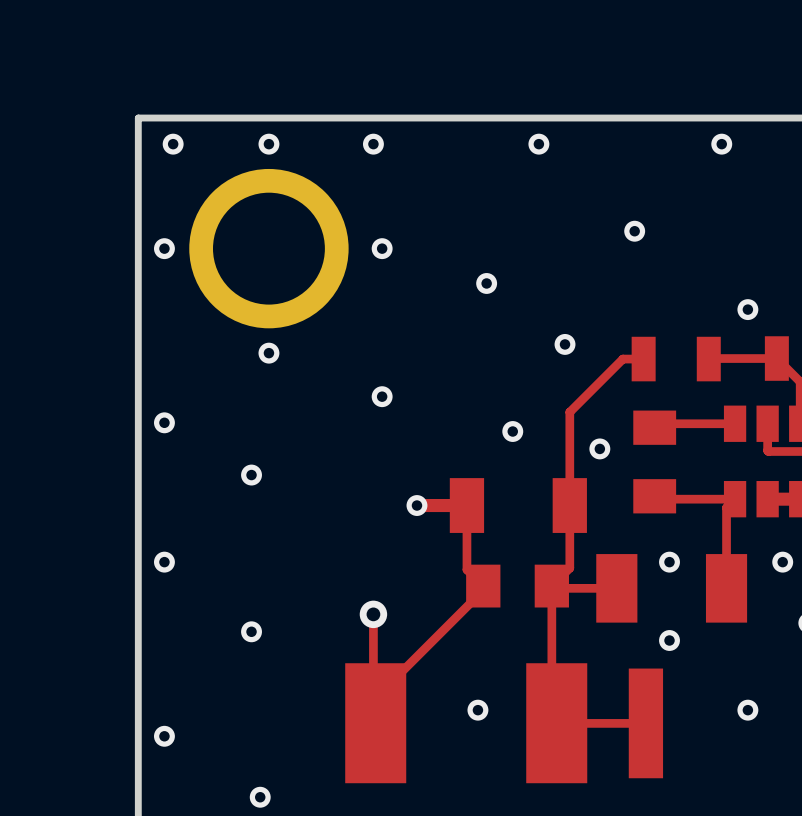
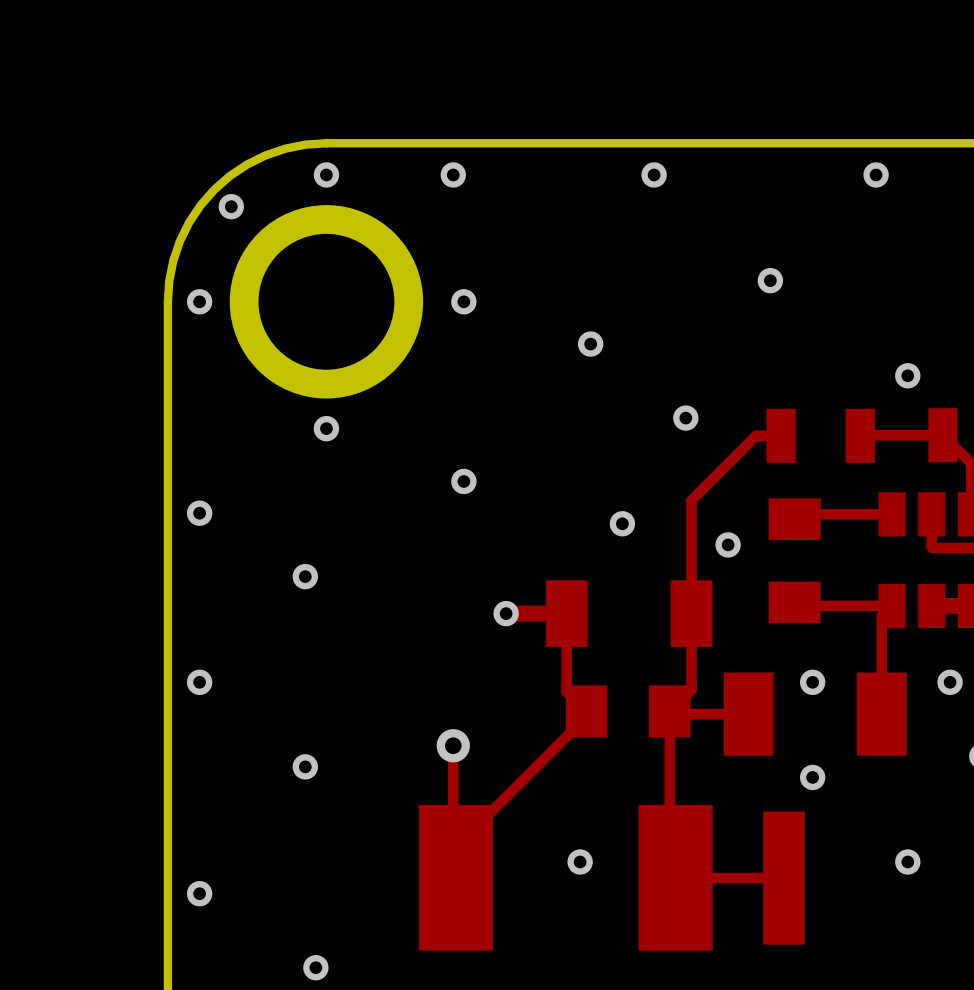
board edge: (268, 118) (138, 118) (138, 248) -> (326, 143) (305, 144) (265, 155) (247, 164) (214, 189) (189, 222) (179, 241) (169, 281) (167, 301)
via position: (173, 144) -> (231, 206)

